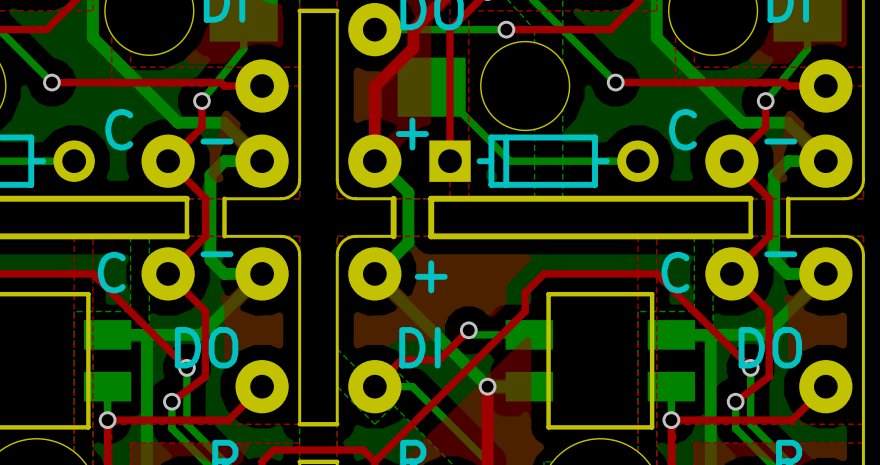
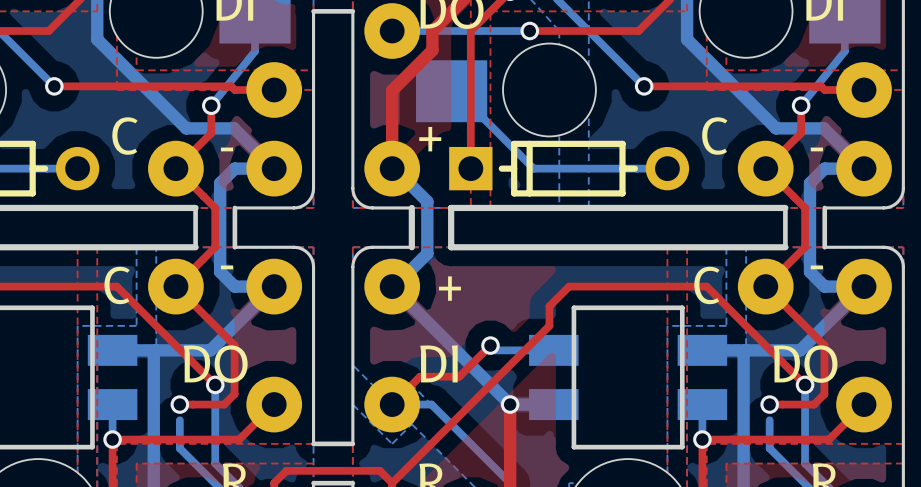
top track: (92, 273) (186, 367) -> (97, 286) (116, 286) (215, 384)
top track: (656, 273) (750, 367) -> (687, 286) (706, 286) (805, 384)
top track: (205, 311) (205, 376) (171, 401) -> (214, 325) (234, 345) (234, 394) (224, 404) (179, 404)
top track: (769, 311) (769, 376) (735, 401) -> (804, 325) (824, 345) (824, 394) (814, 404) (769, 404)
bottom track: (186, 367) (186, 424) (205, 443) -> (215, 384) (215, 463)
via: (186, 367) -> none
via: none -> (215, 384)
bottom track: (750, 367) (750, 424) (769, 443) -> (805, 384) (805, 463)
via: (750, 367) -> none
via: none -> (805, 384)
via position: (171, 401) -> (179, 404)
via position: (735, 401) -> (769, 404)

